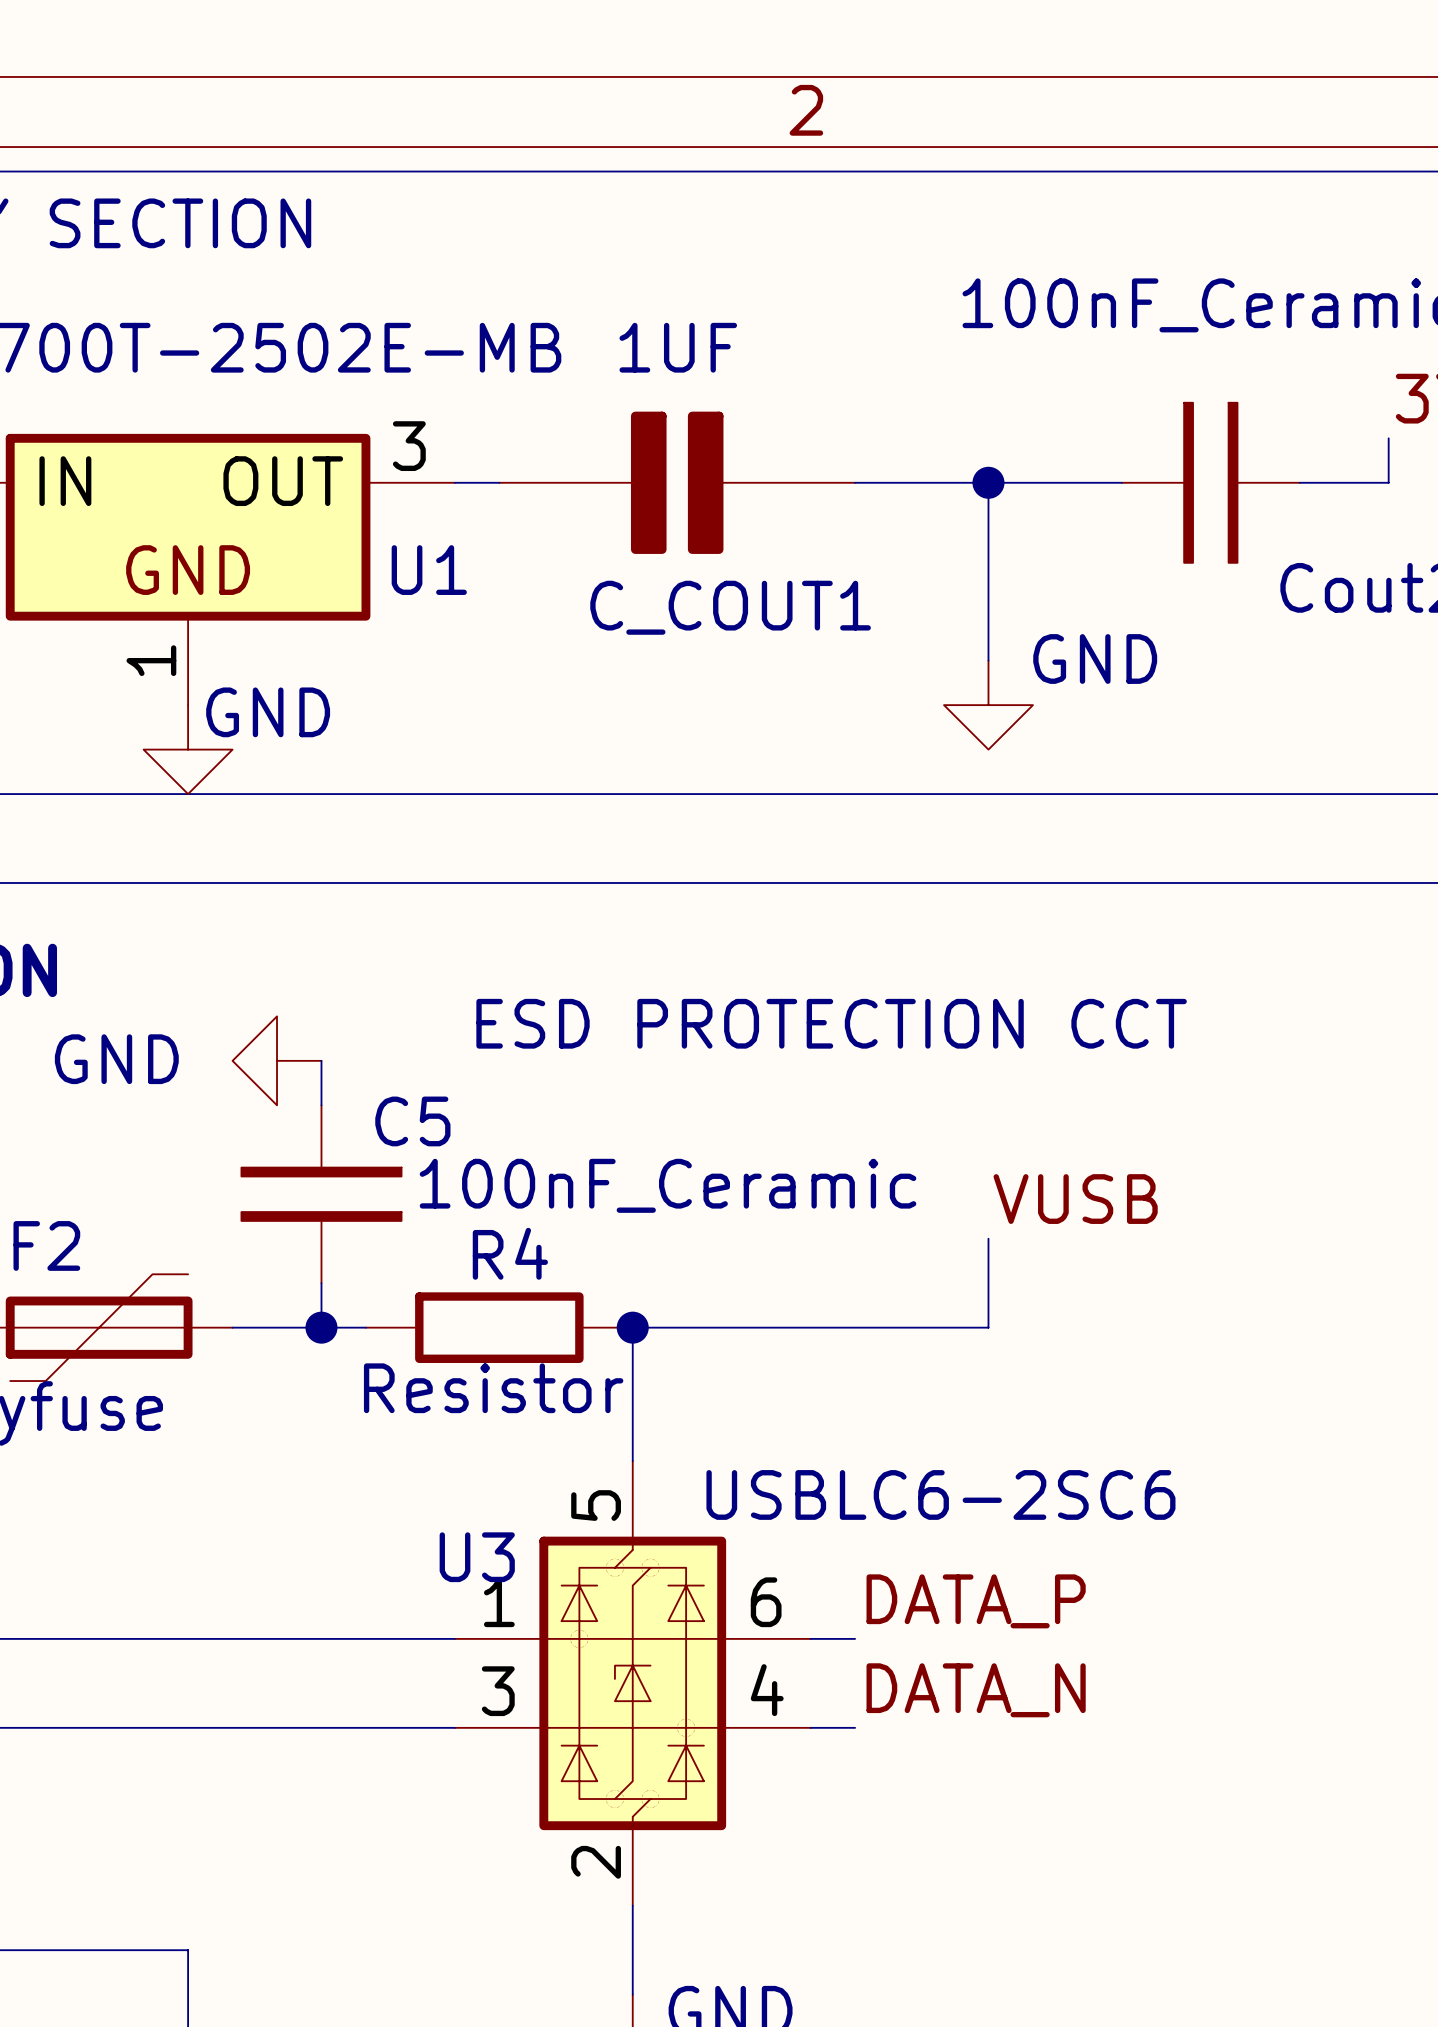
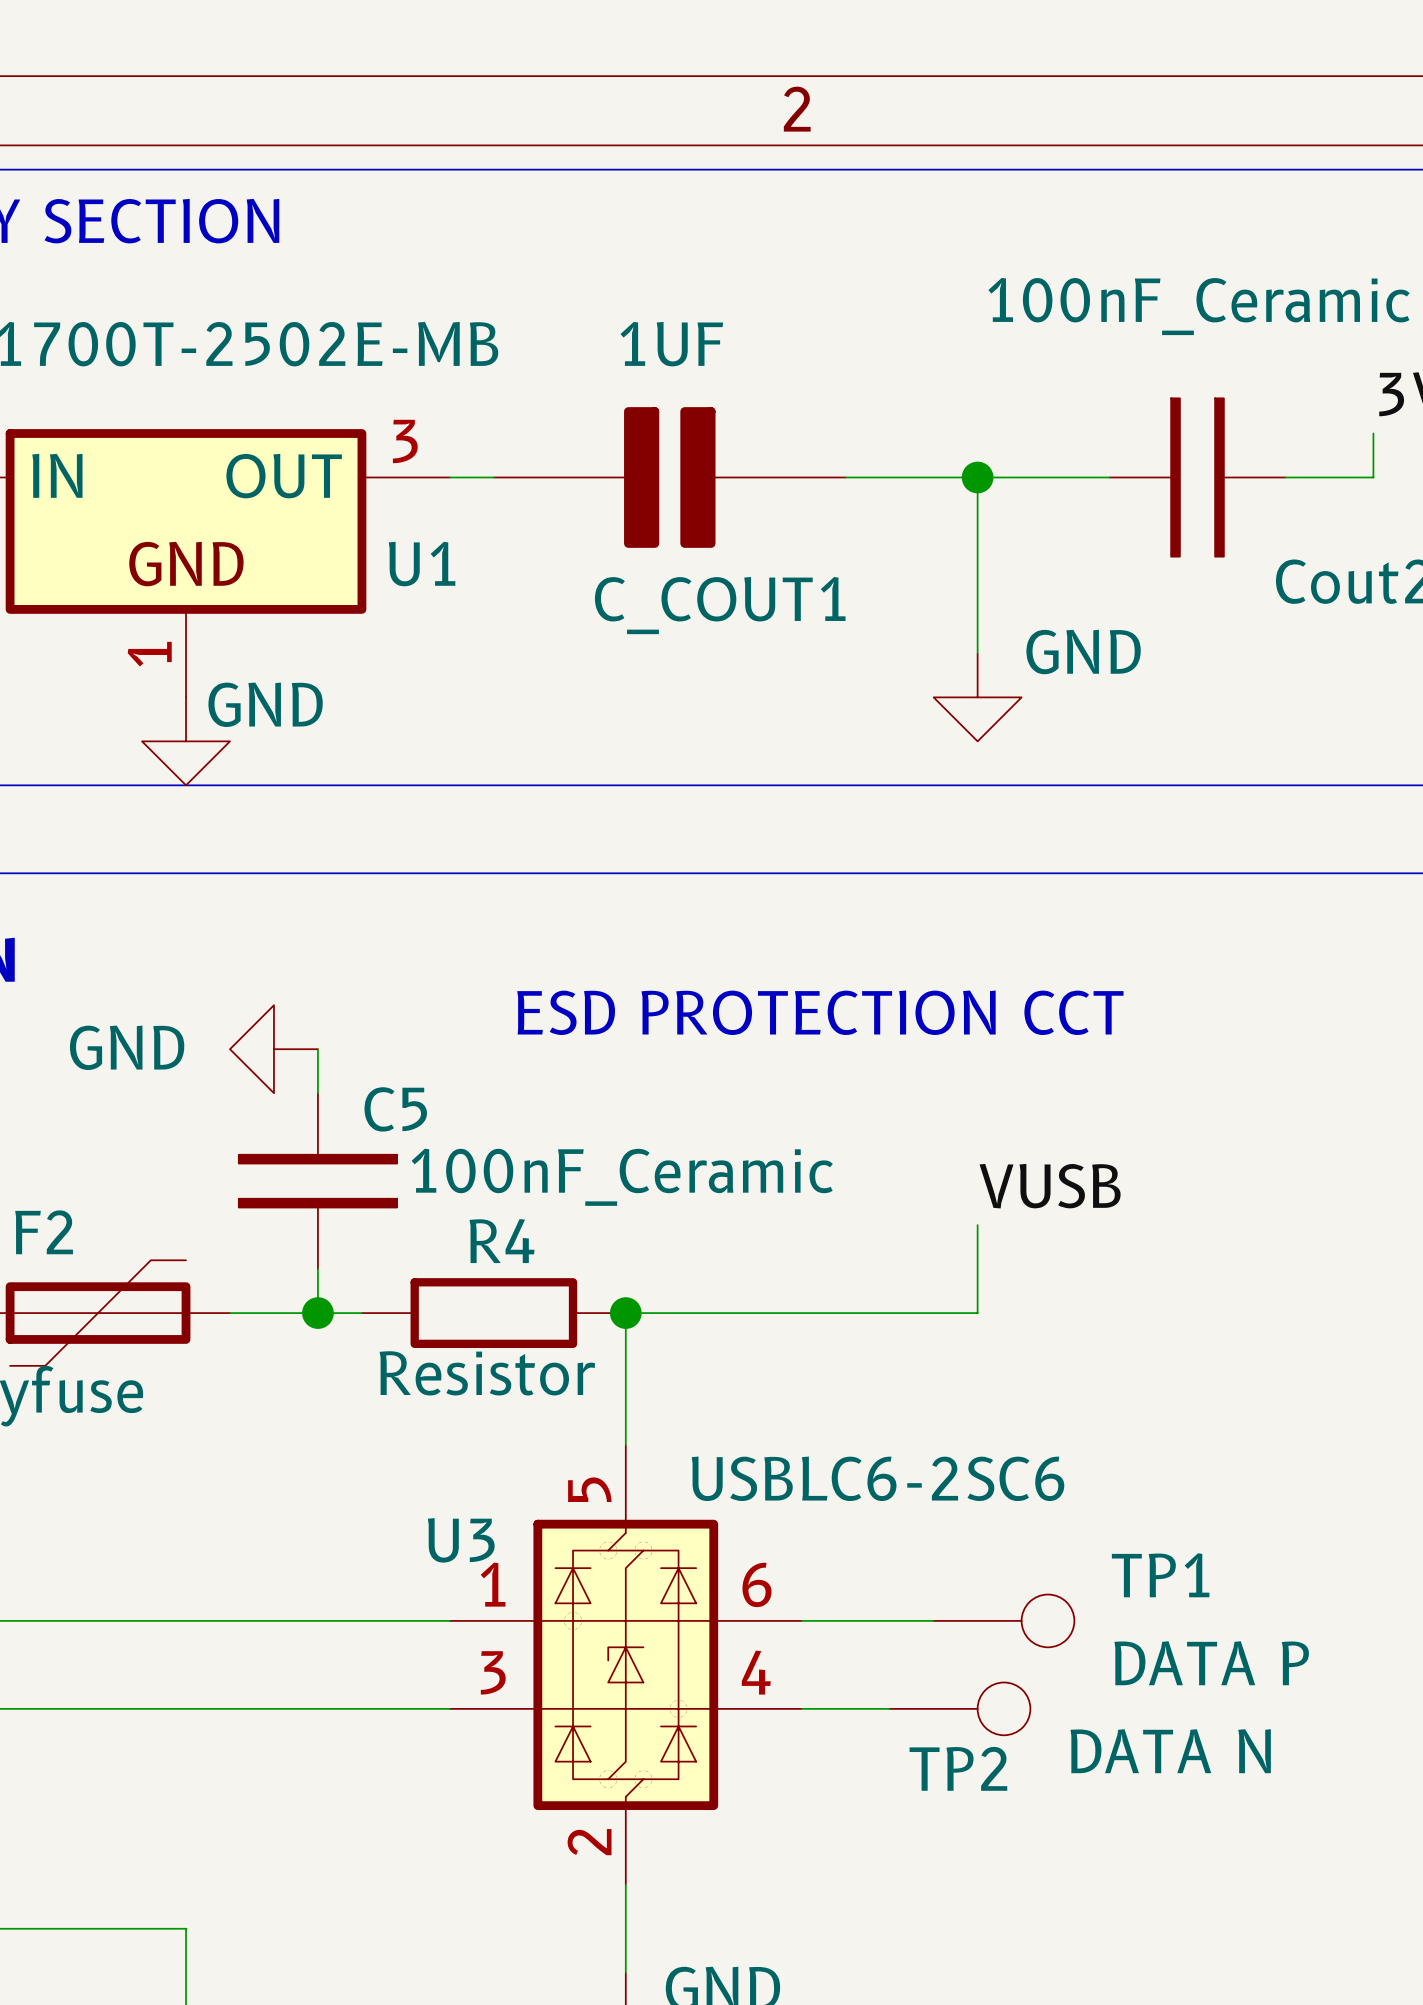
label: DATA_P (976, 1601) -> none
wire: none -> (845, 1620) (933, 1620)
TP1: none -> DATA P (1004, 1620)
label: DATA_N (976, 1690) -> none
wire: none -> (845, 1708) (889, 1708)
TP2: none -> DATA N (960, 1708)

